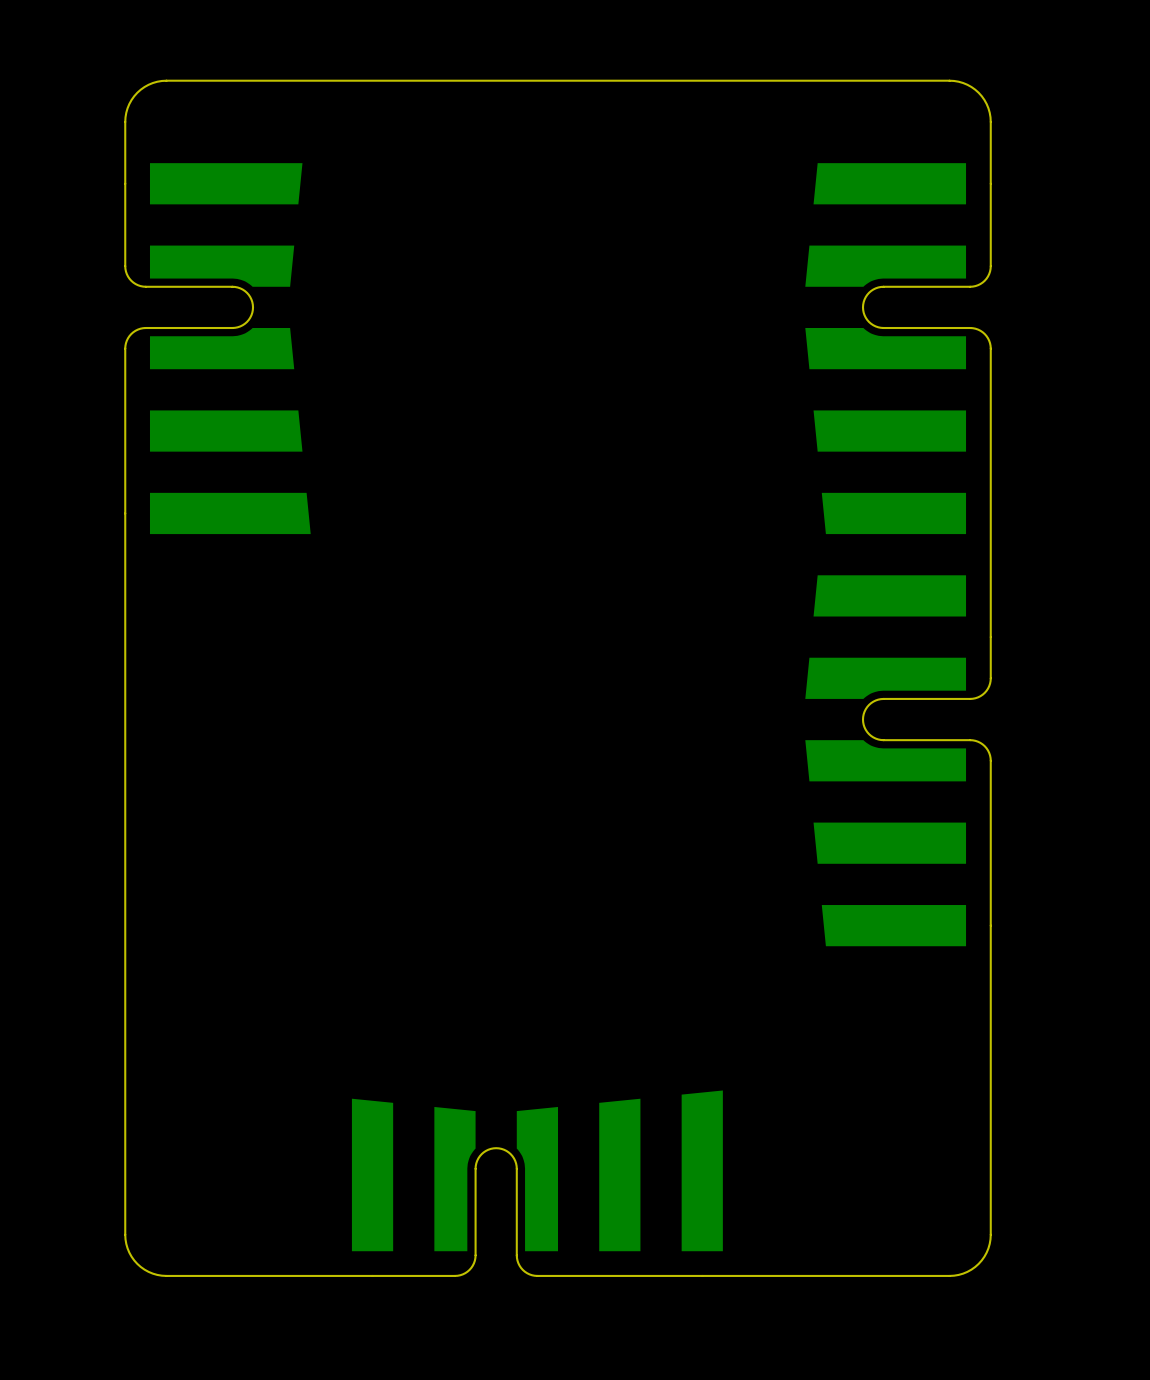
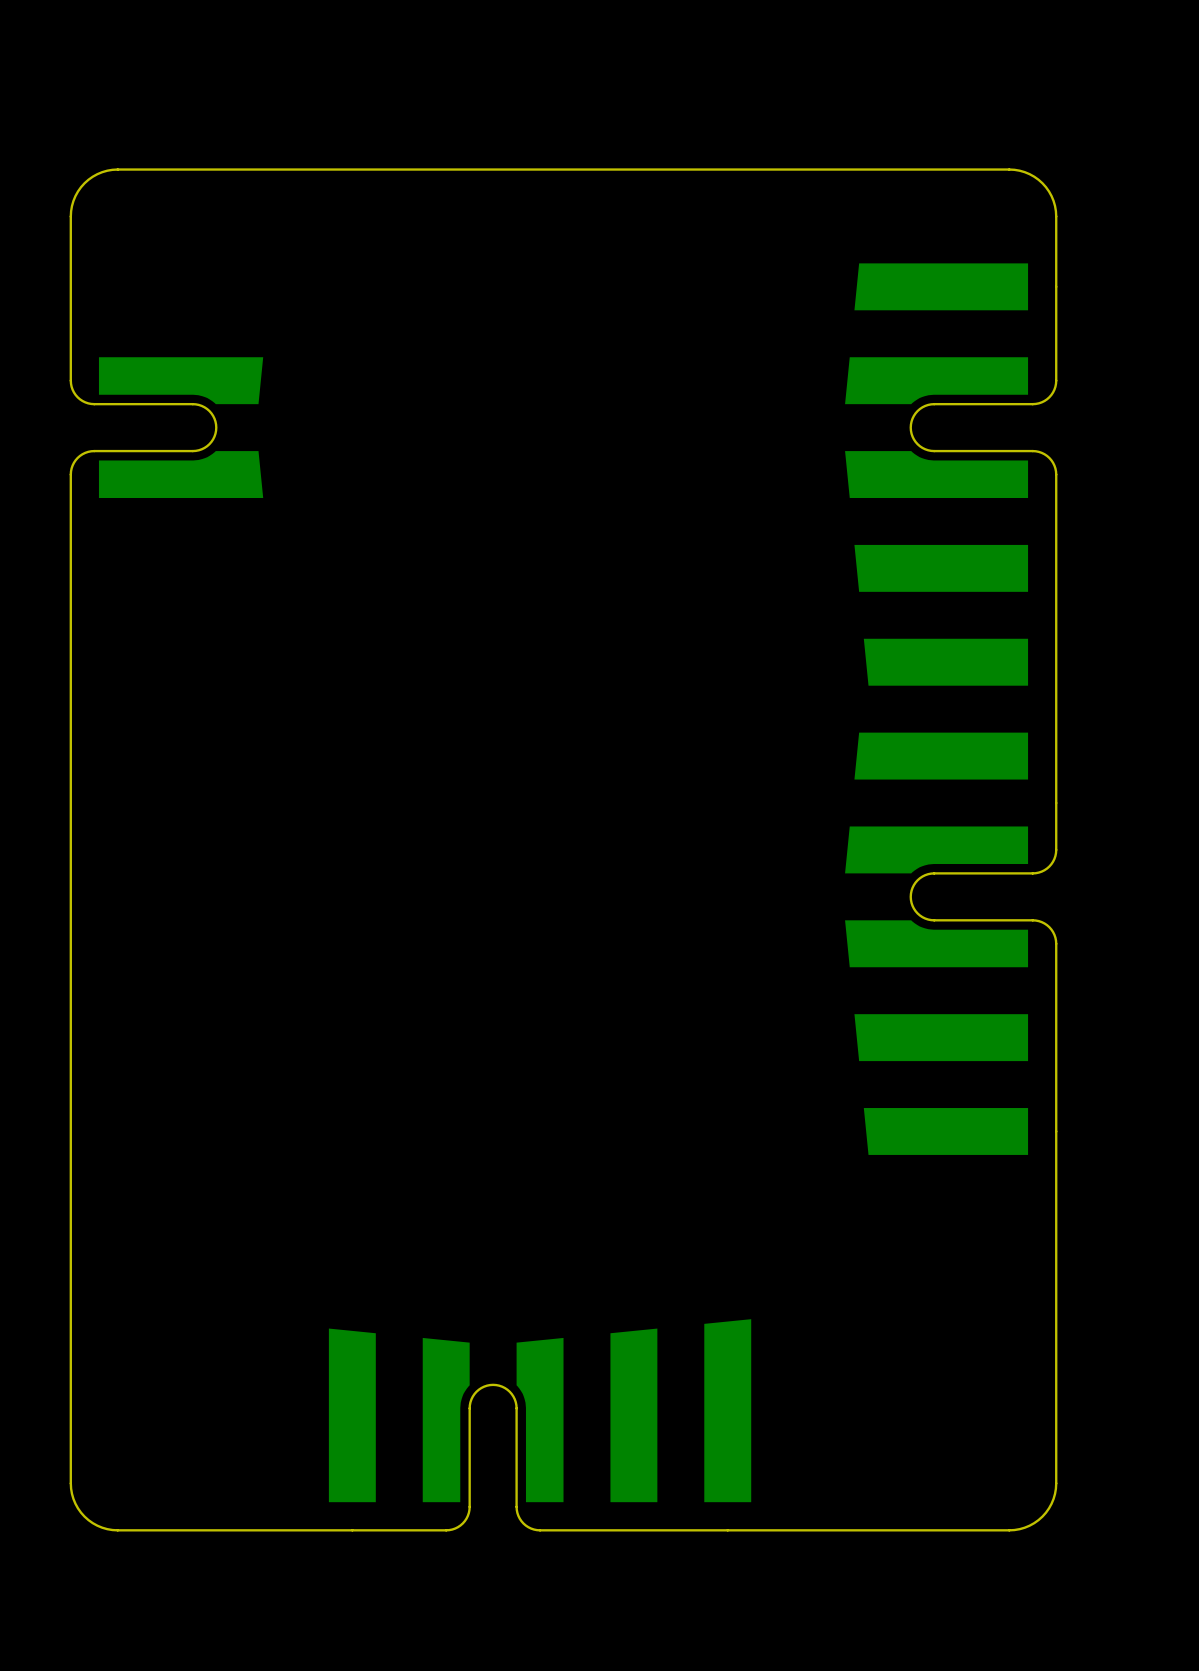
part: (217, 348) -> none

